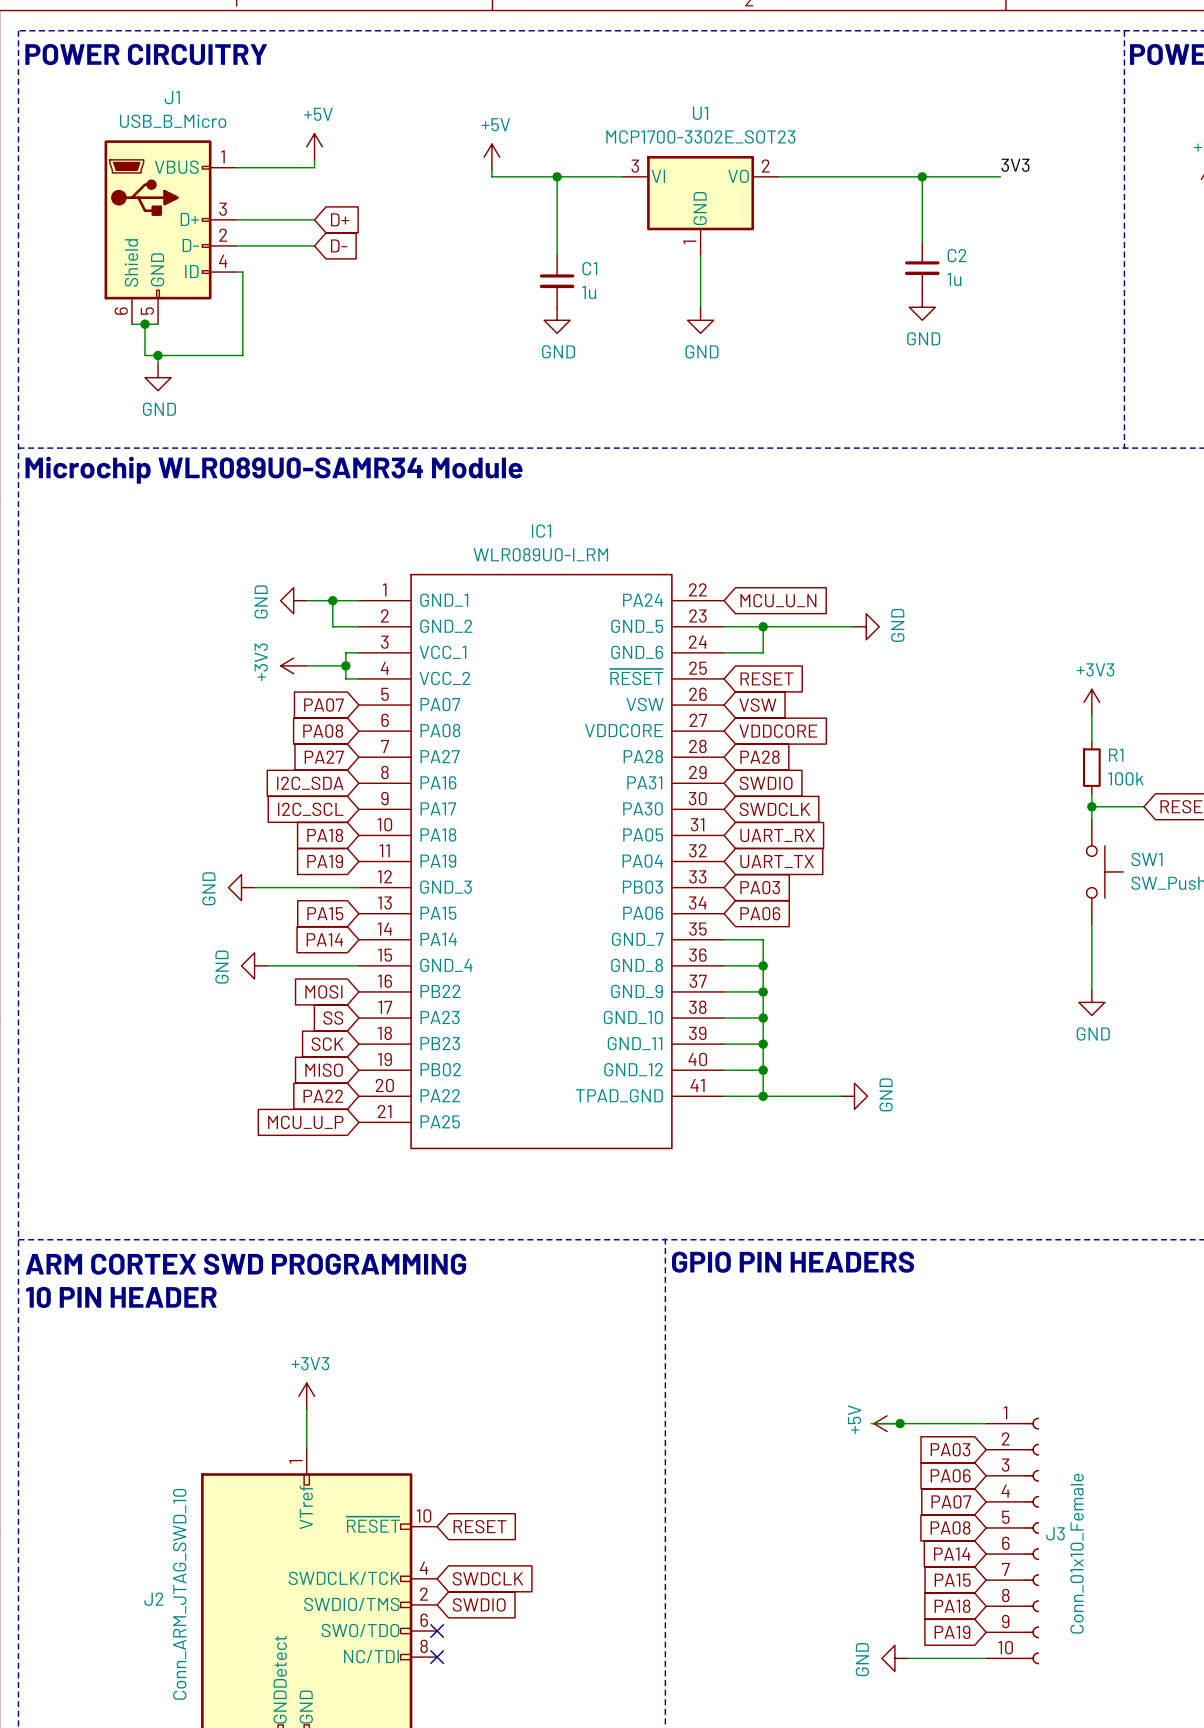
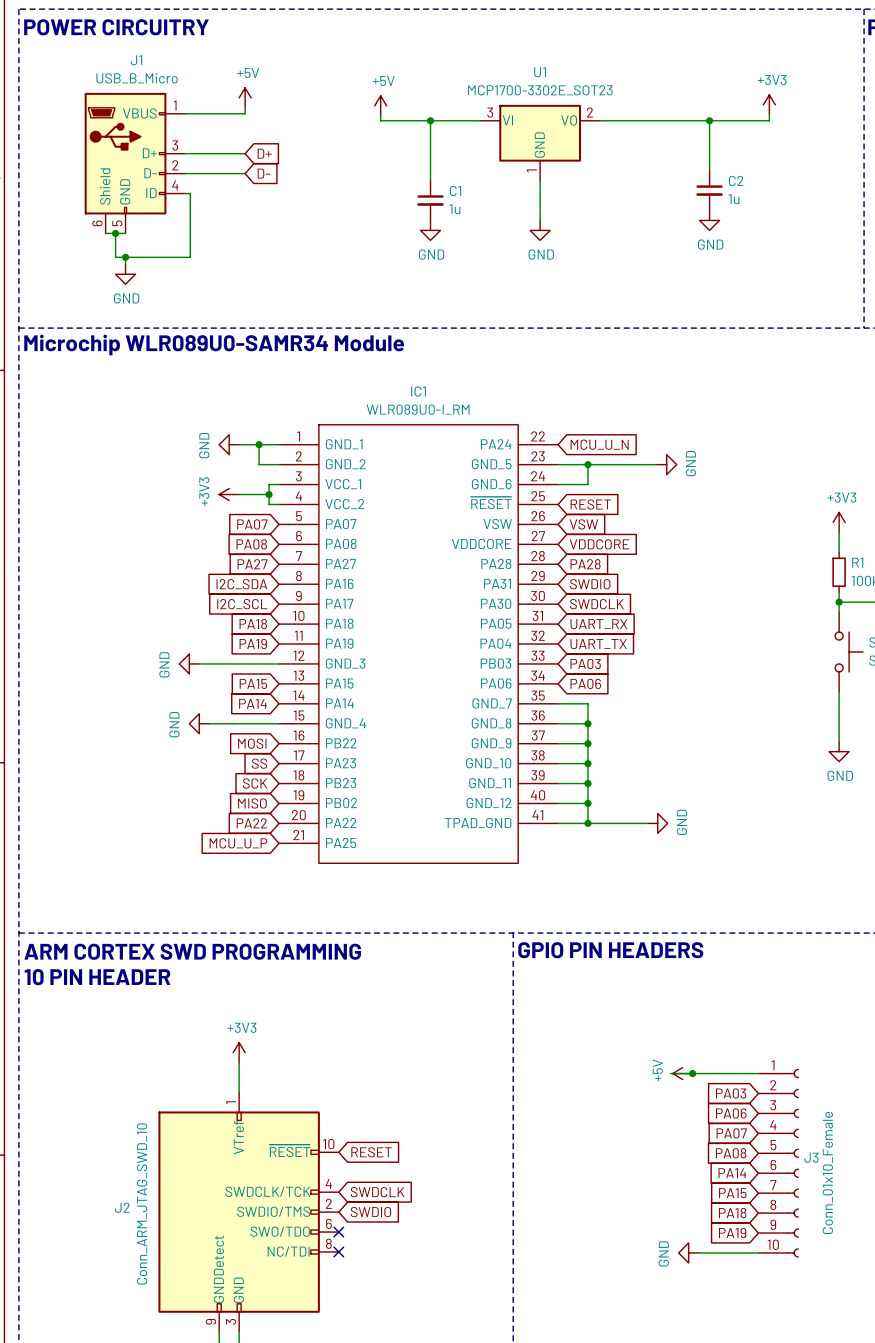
power symbol: none -> +3V3 (769, 104)
label: 3V3 (1015, 165) -> none
wire: none -> (769, 114) (769, 120)

